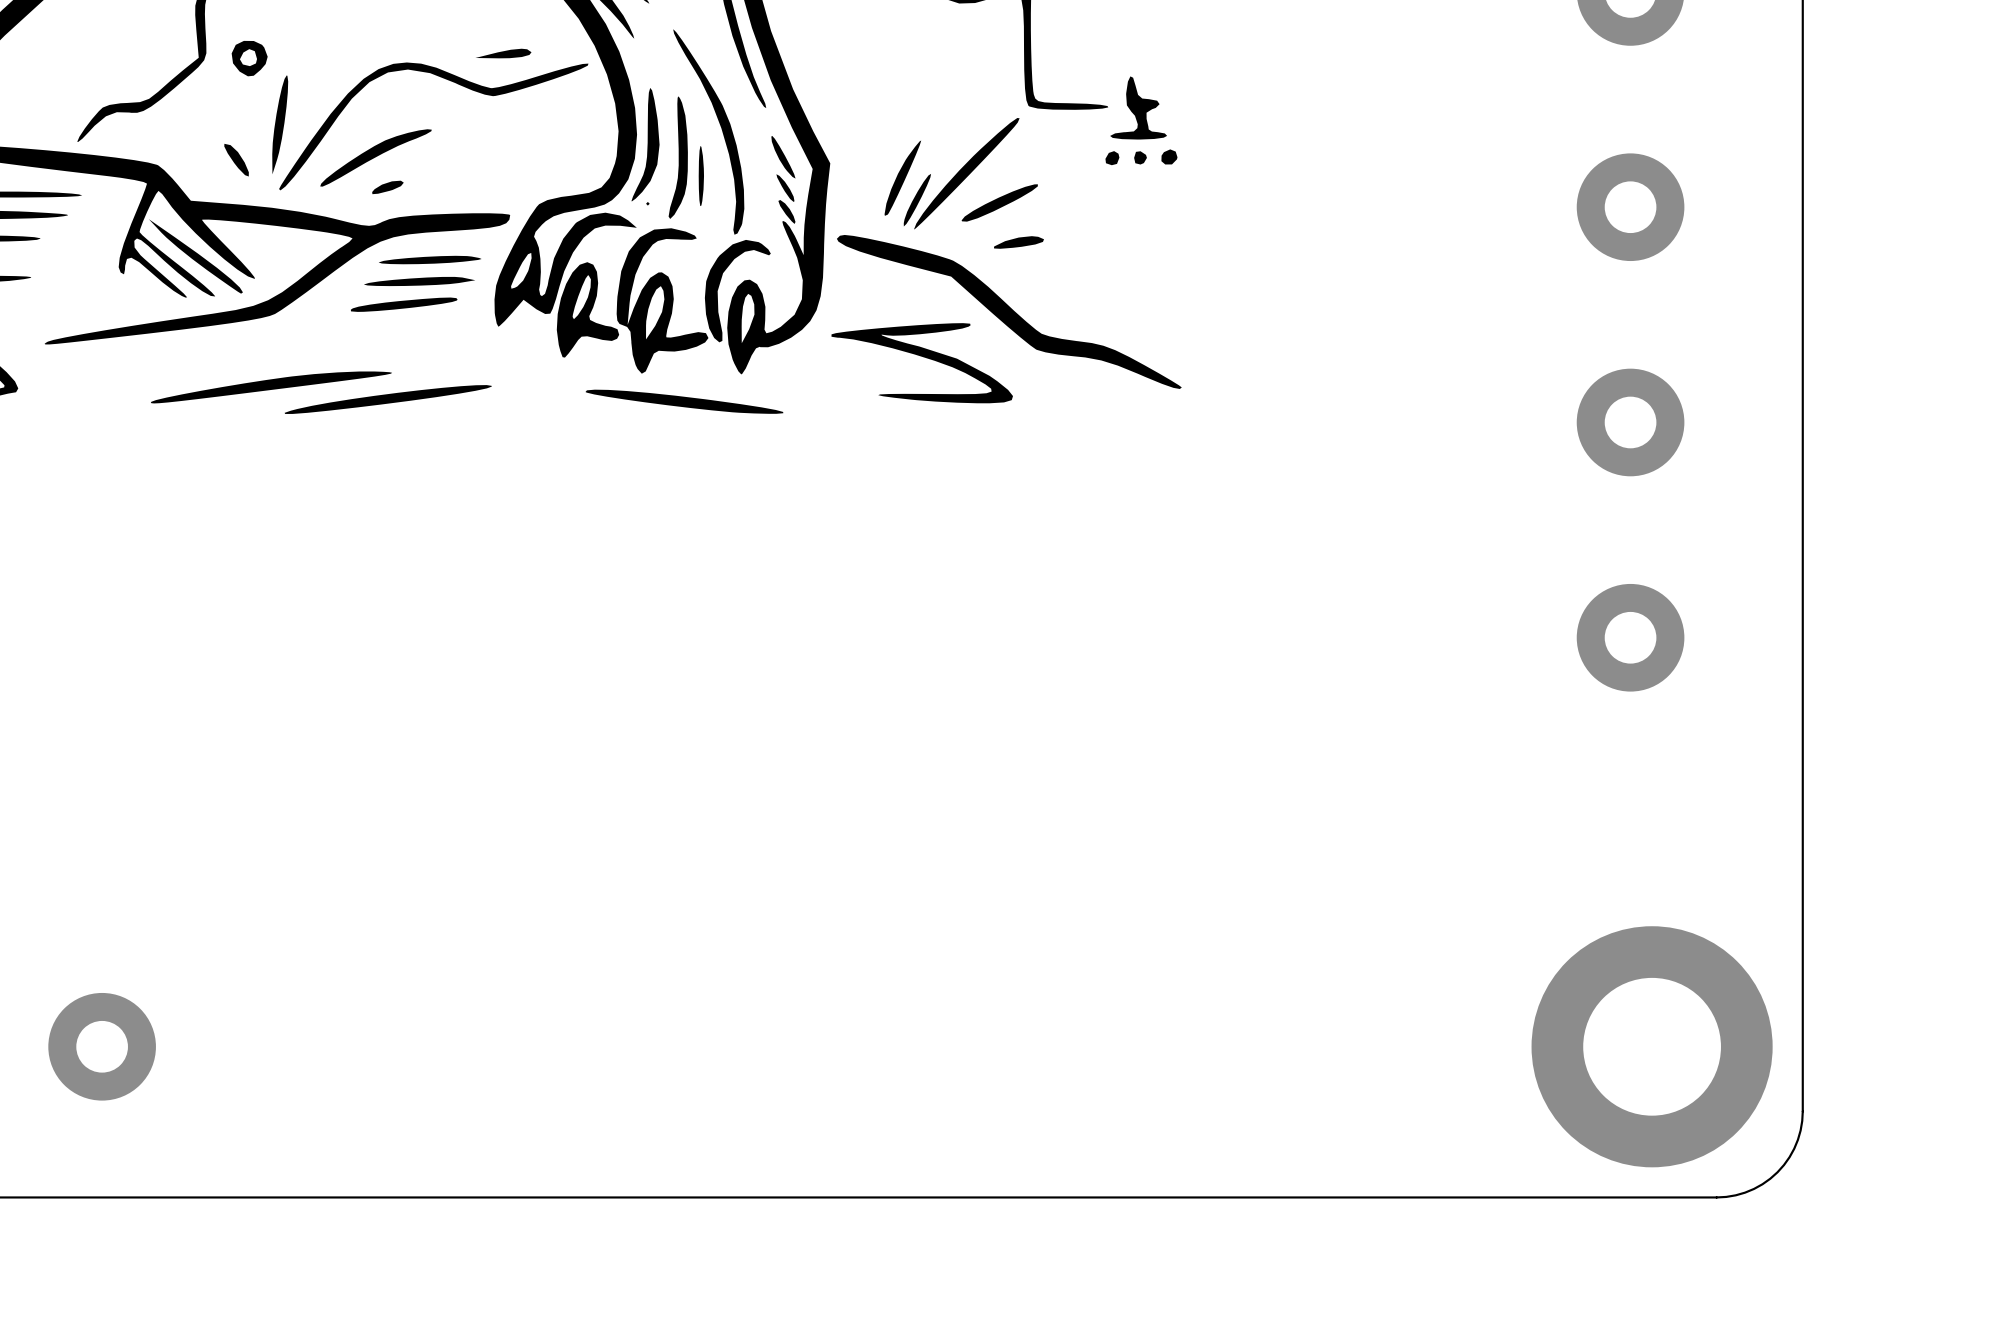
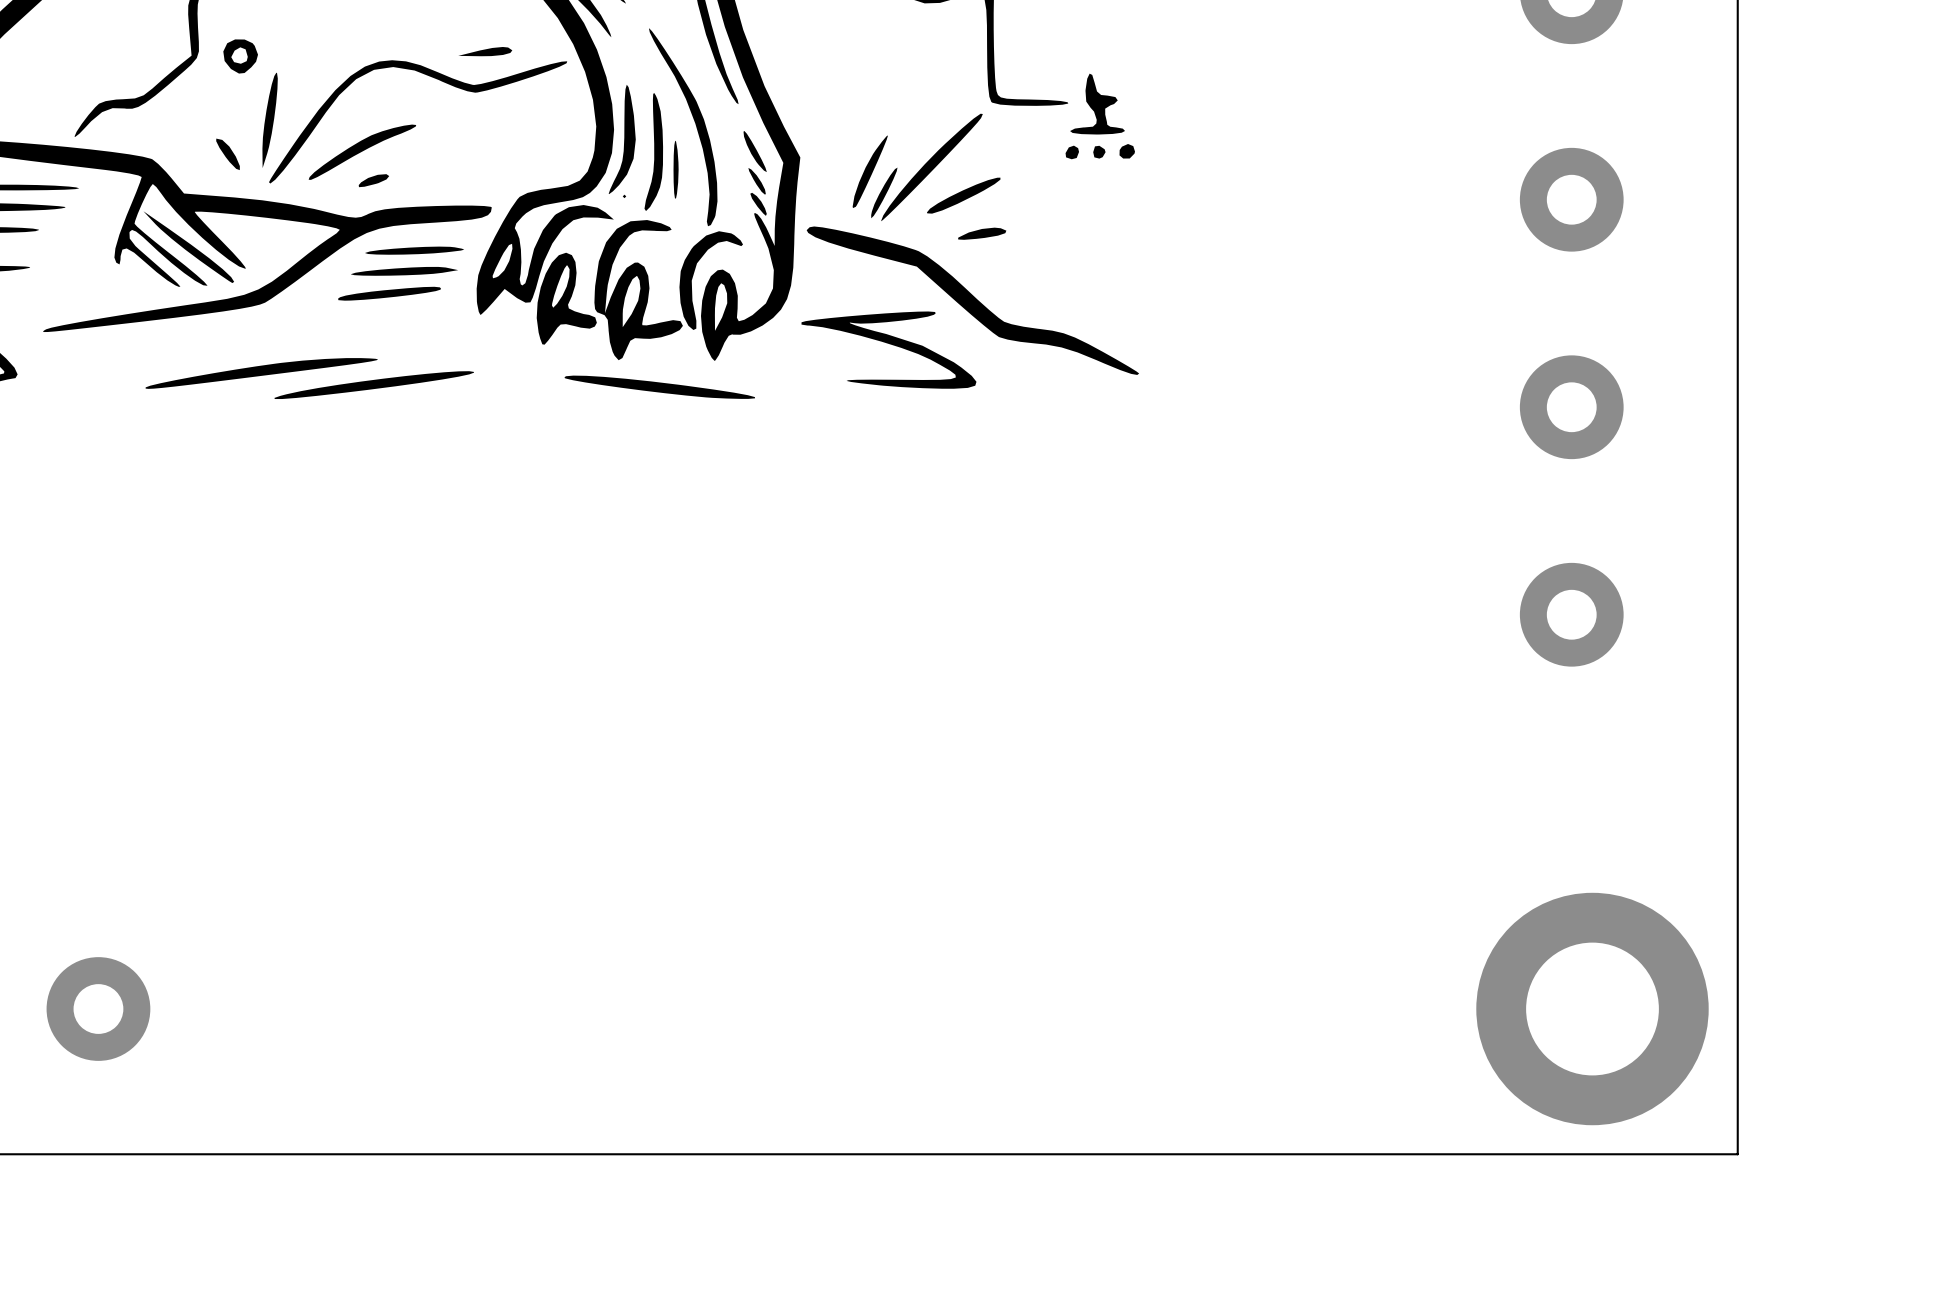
board edge: (1802, 1111) (1797, 1139) (1789, 1157) (1777, 1172) (1762, 1184) (1745, 1192) (1716, 1197) -> (1737, 1071) (1737, 1154) (1654, 1154)

